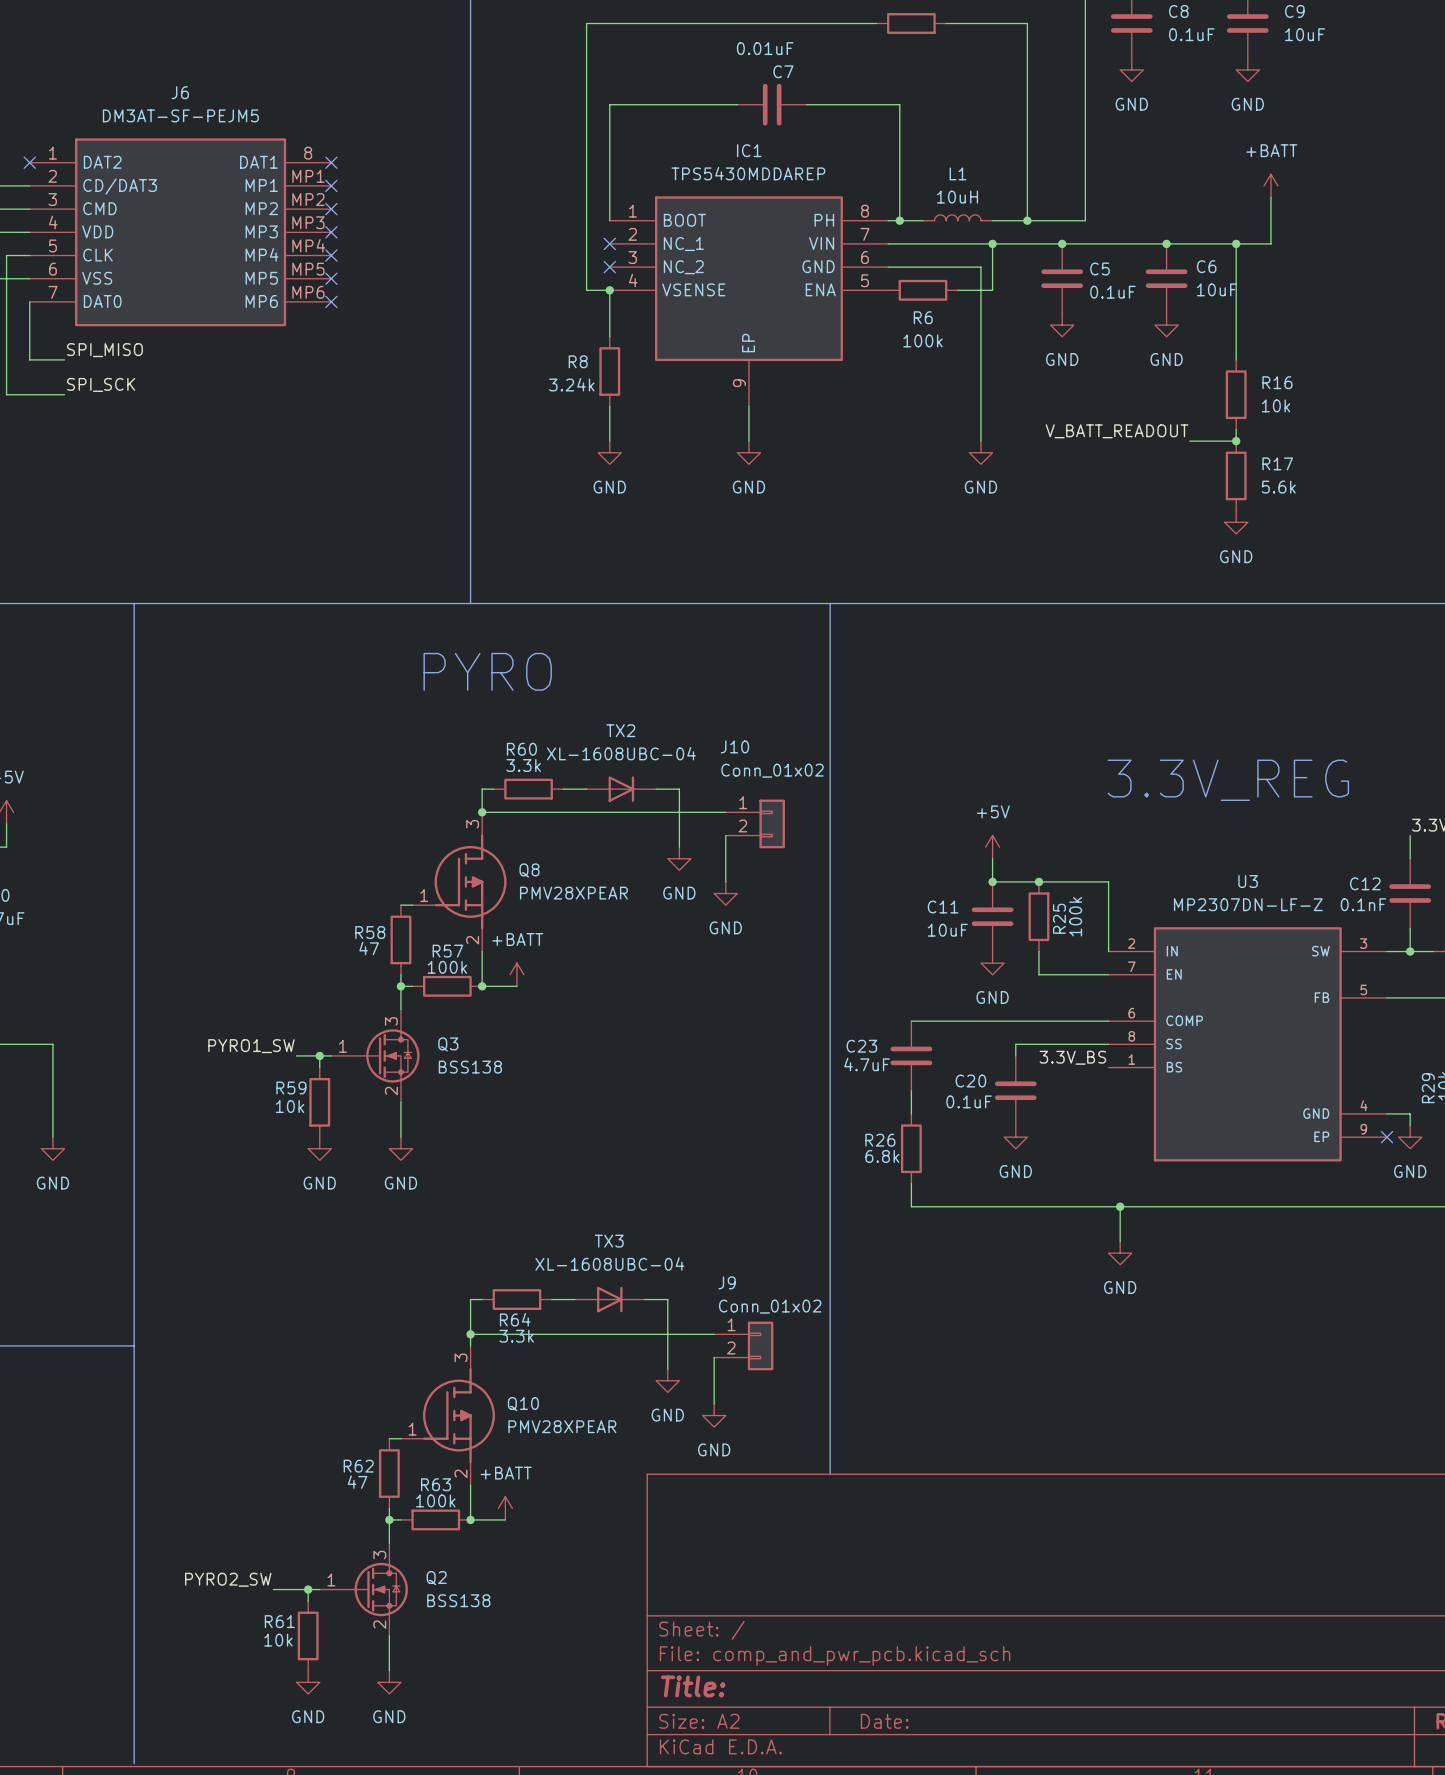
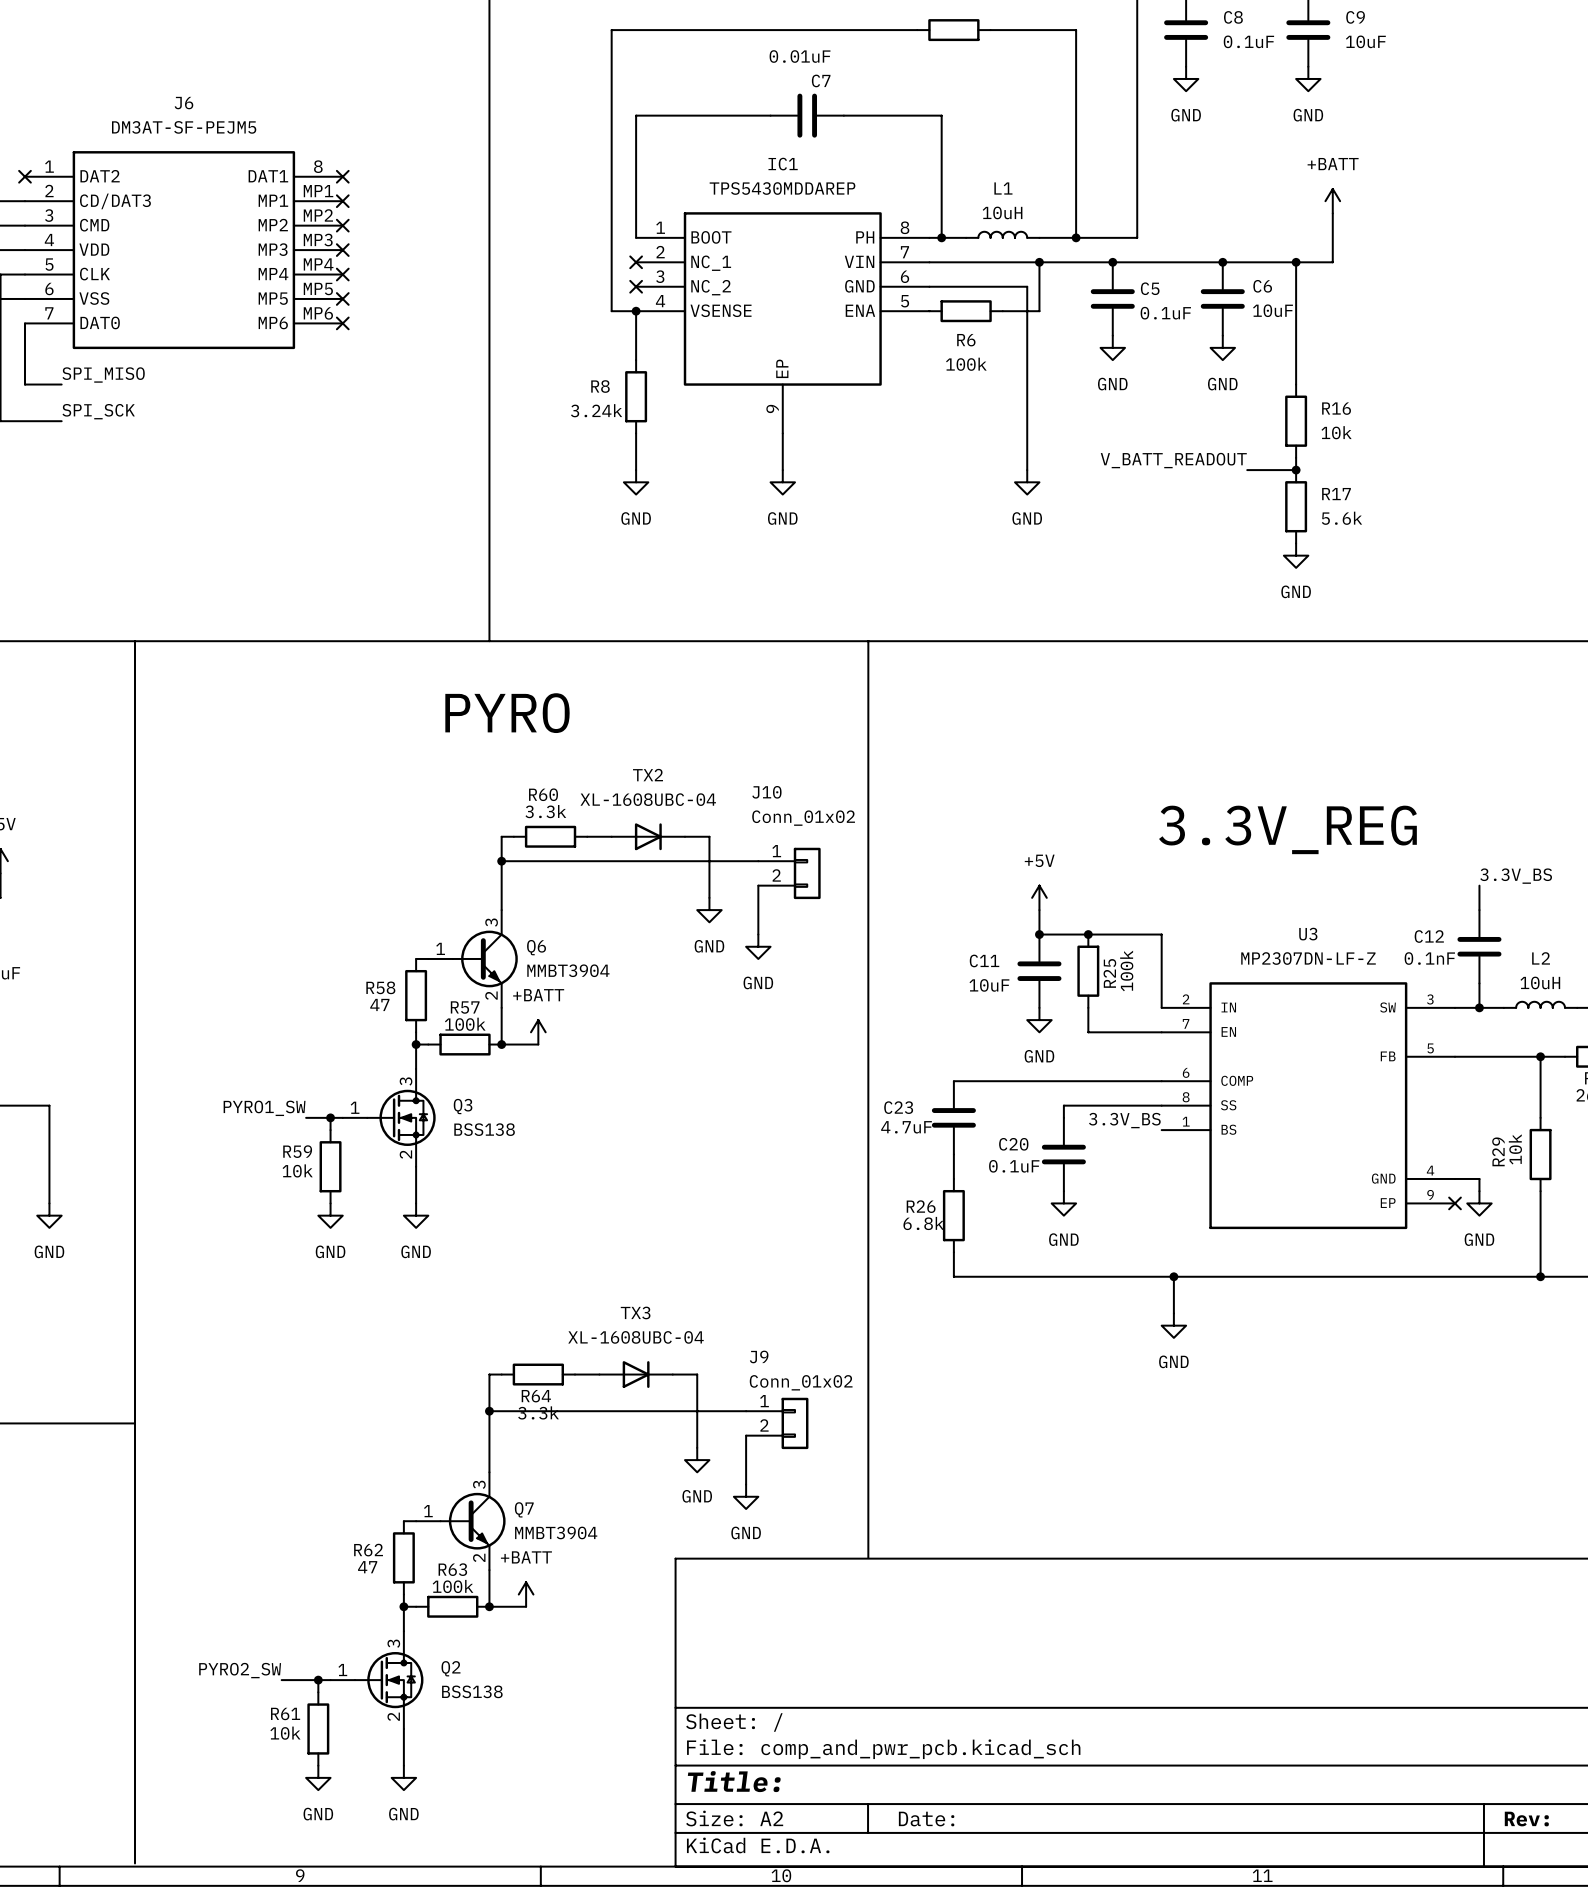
Q8: PMV28XPEAR (459, 881) -> none
Q6: none -> MMBT3904 (473, 958)
Q10: PMV28XPEAR (447, 1415) -> none
Q7: none -> MMBT3904 (460, 1521)

